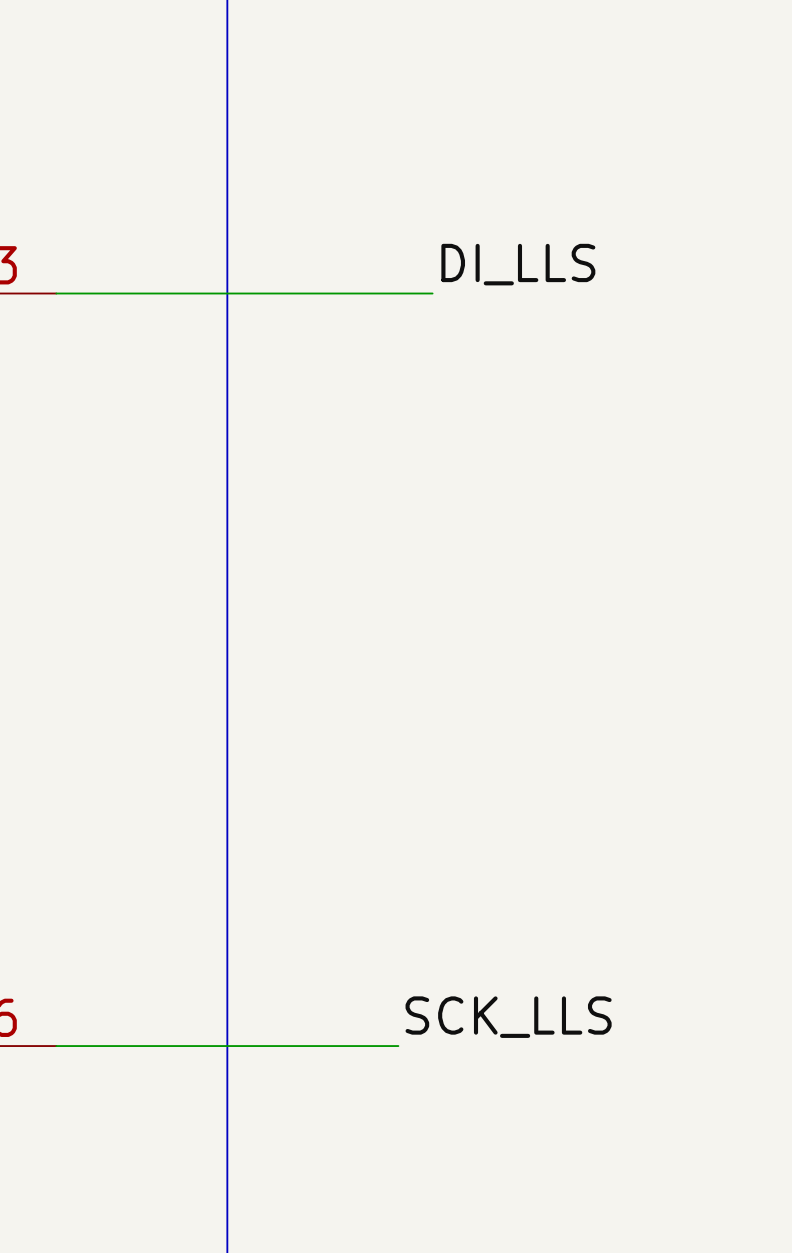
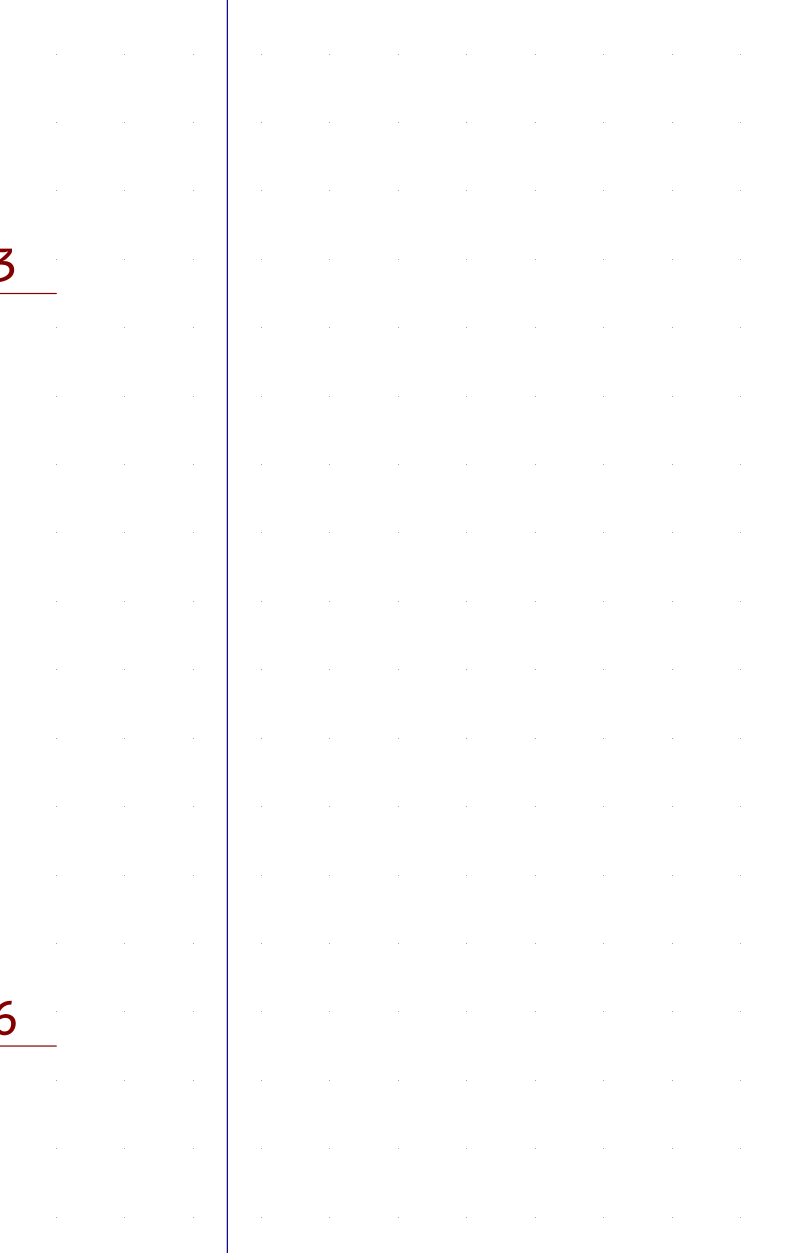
label: DI_LLS (518, 264) -> none
wire: (56, 293) (432, 293) -> none
label: SCK_LLS (508, 1017) -> none
wire: (56, 1046) (398, 1046) -> none

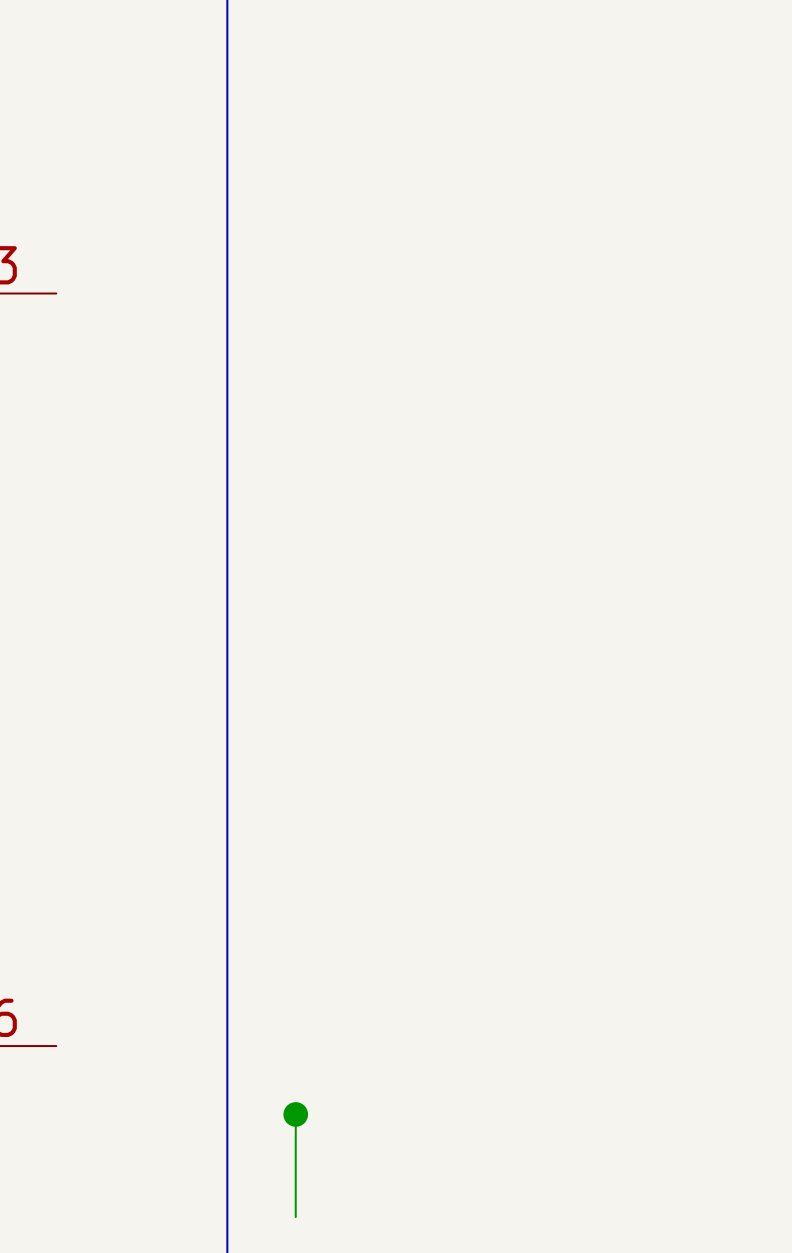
wire: none -> (295, 1114) (295, 1217)
junction: none -> (295, 1114)

